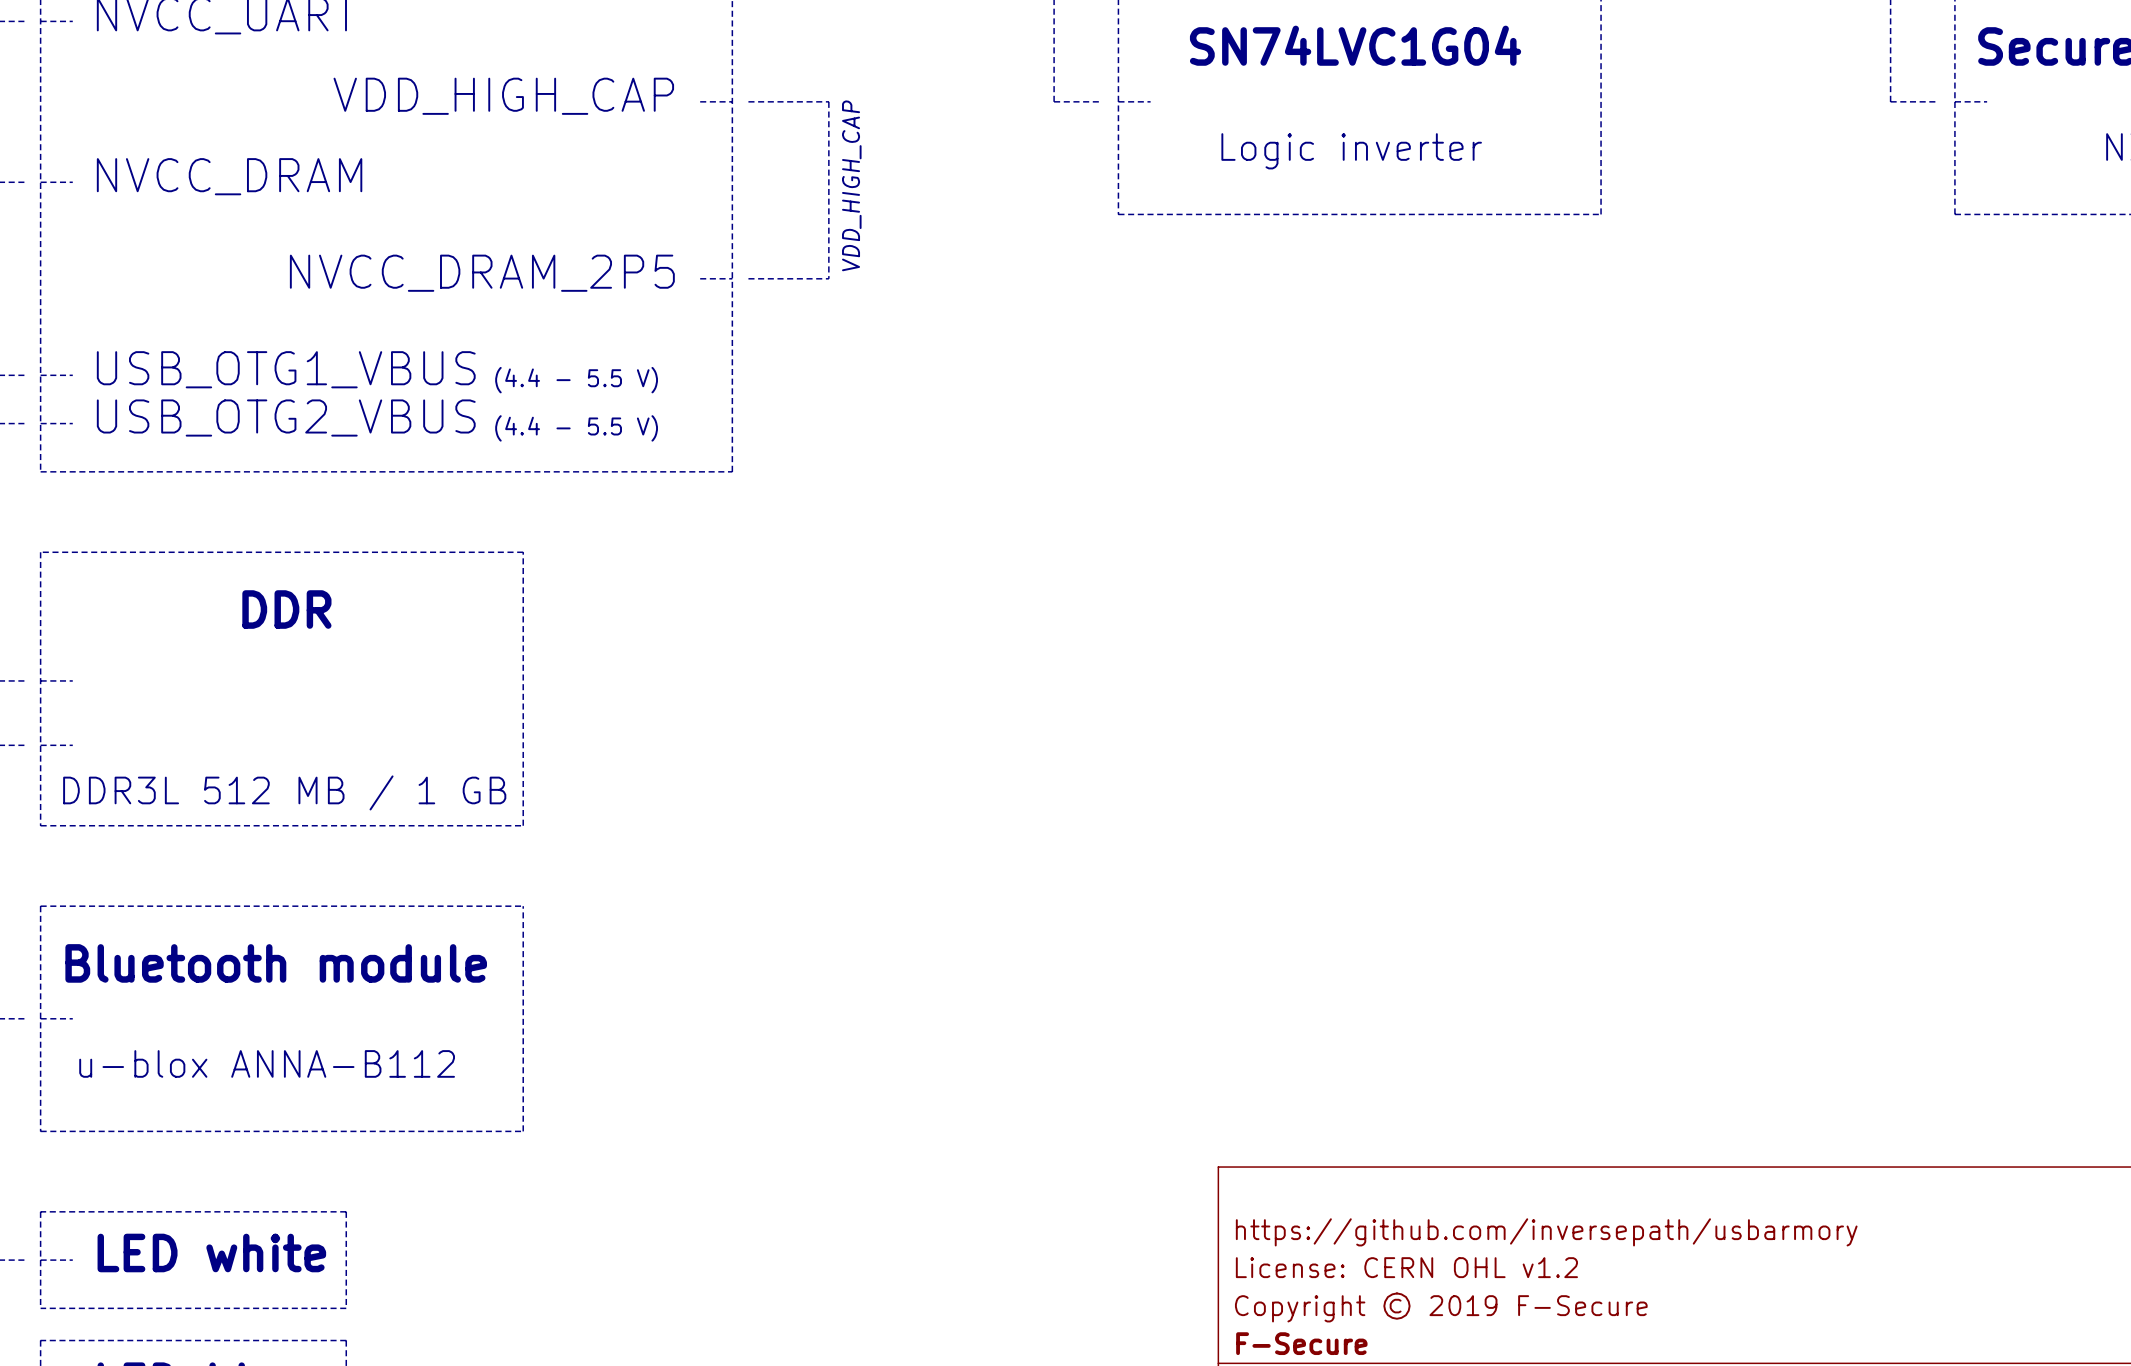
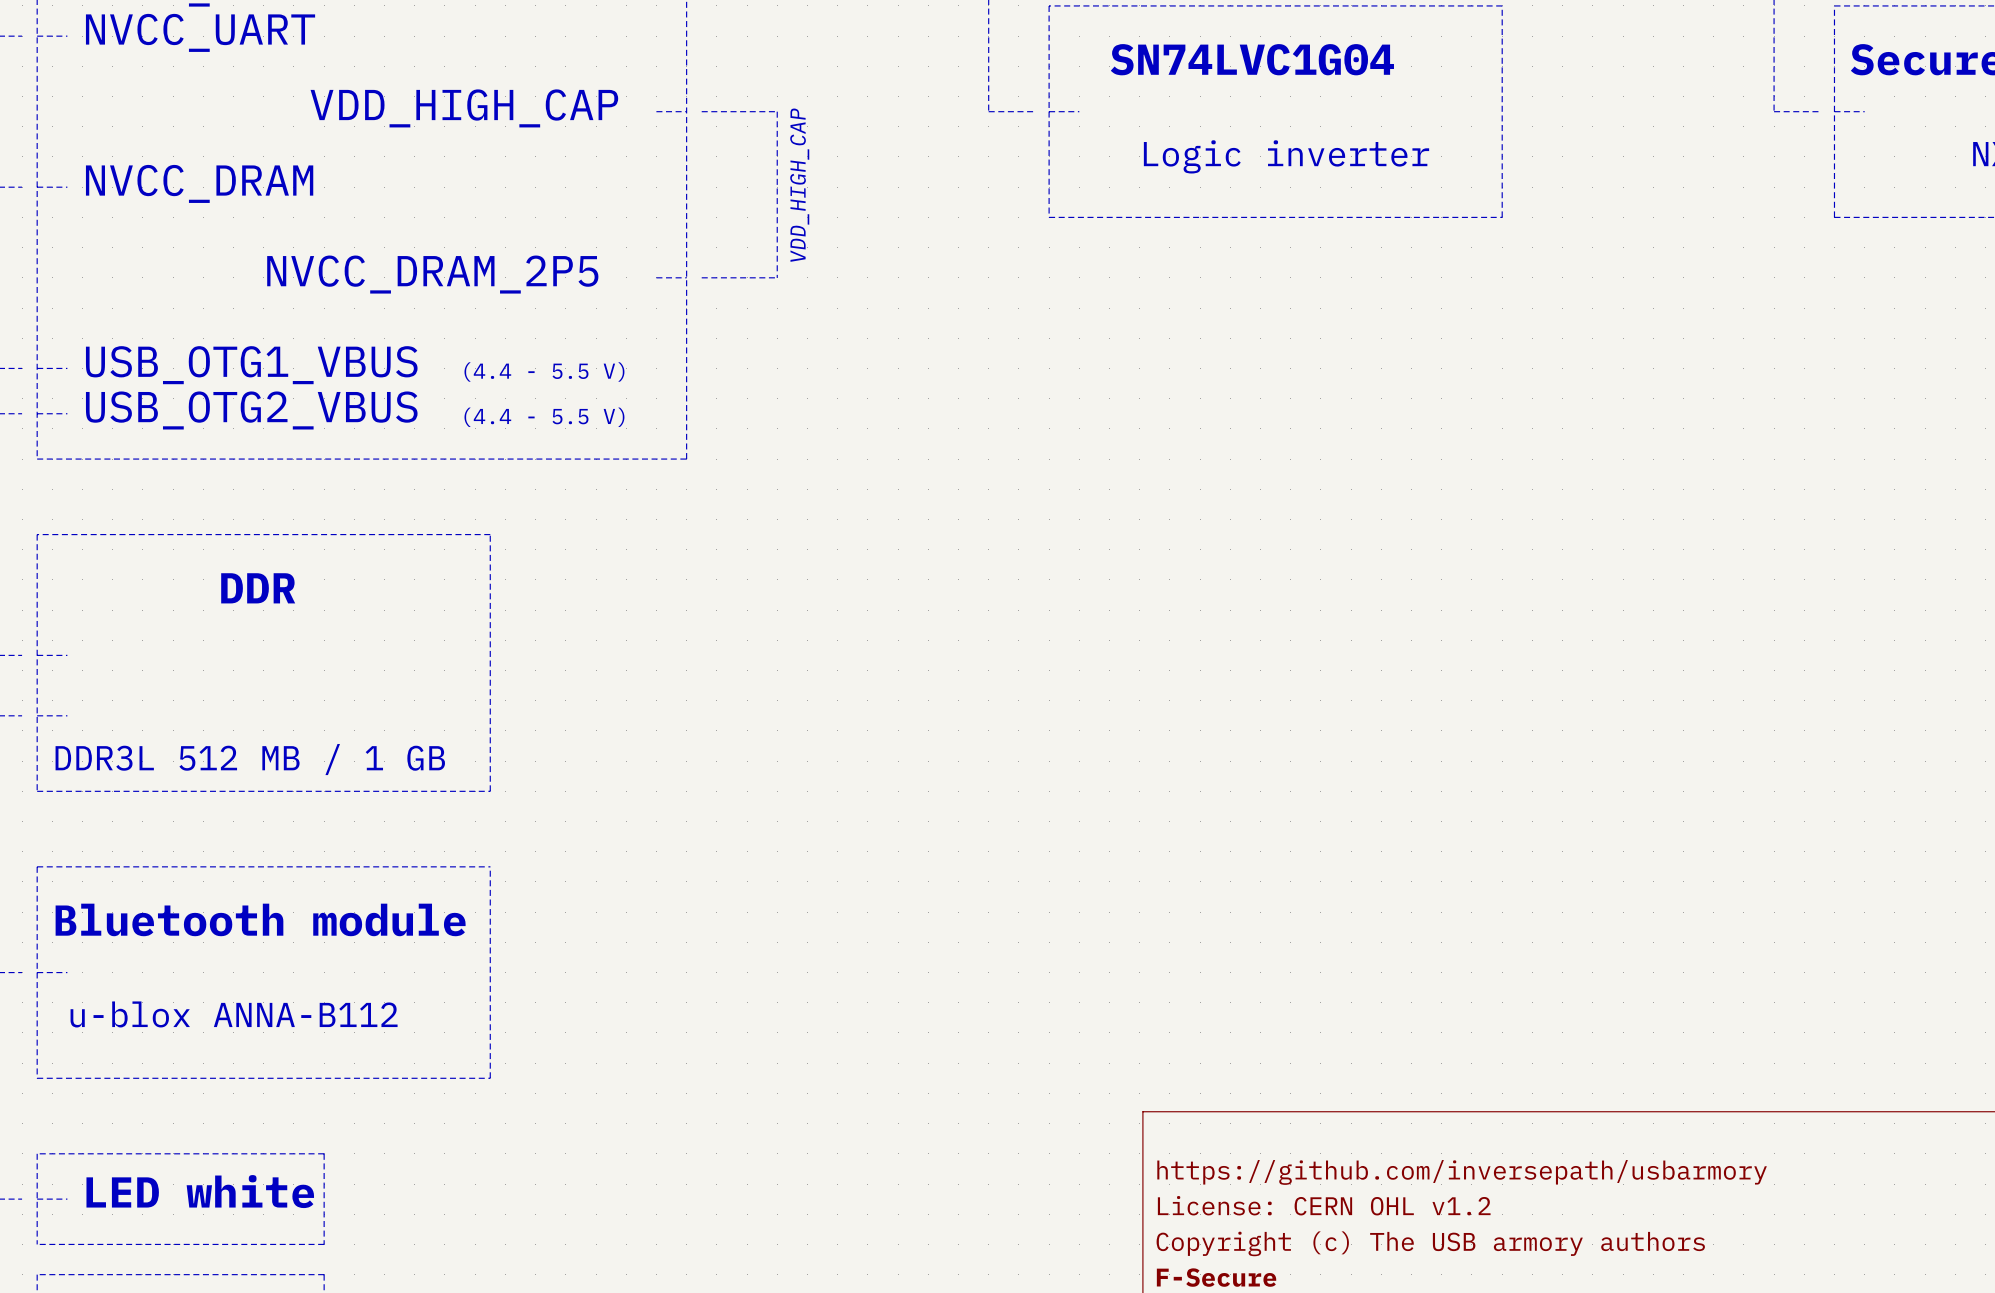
title block: Copyright © 2019 F-Secure (1441, 1307) -> Copyright (c) The USB armory authors (1430, 1243)

